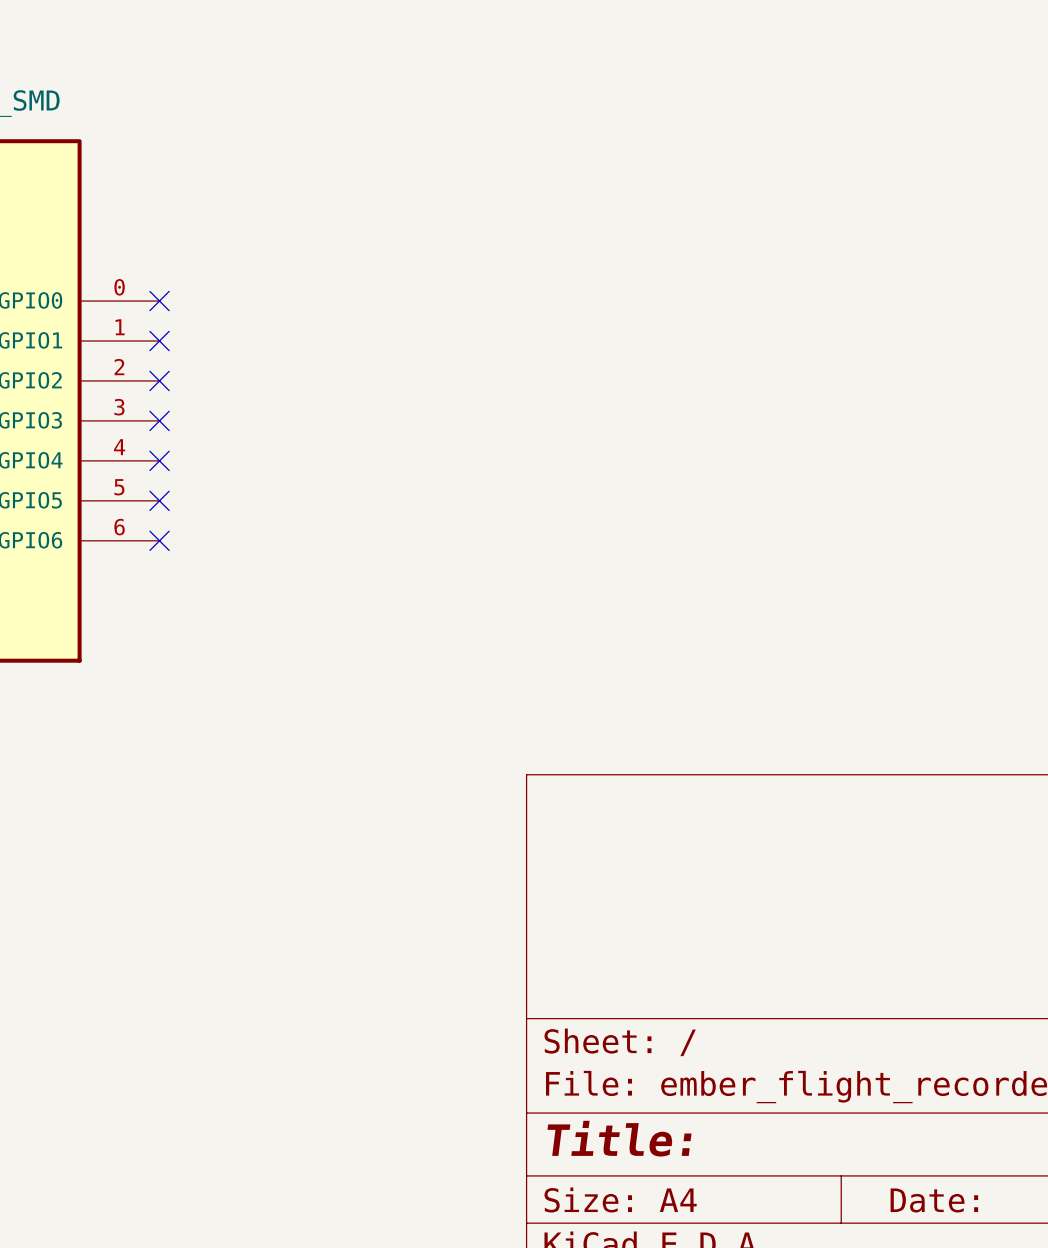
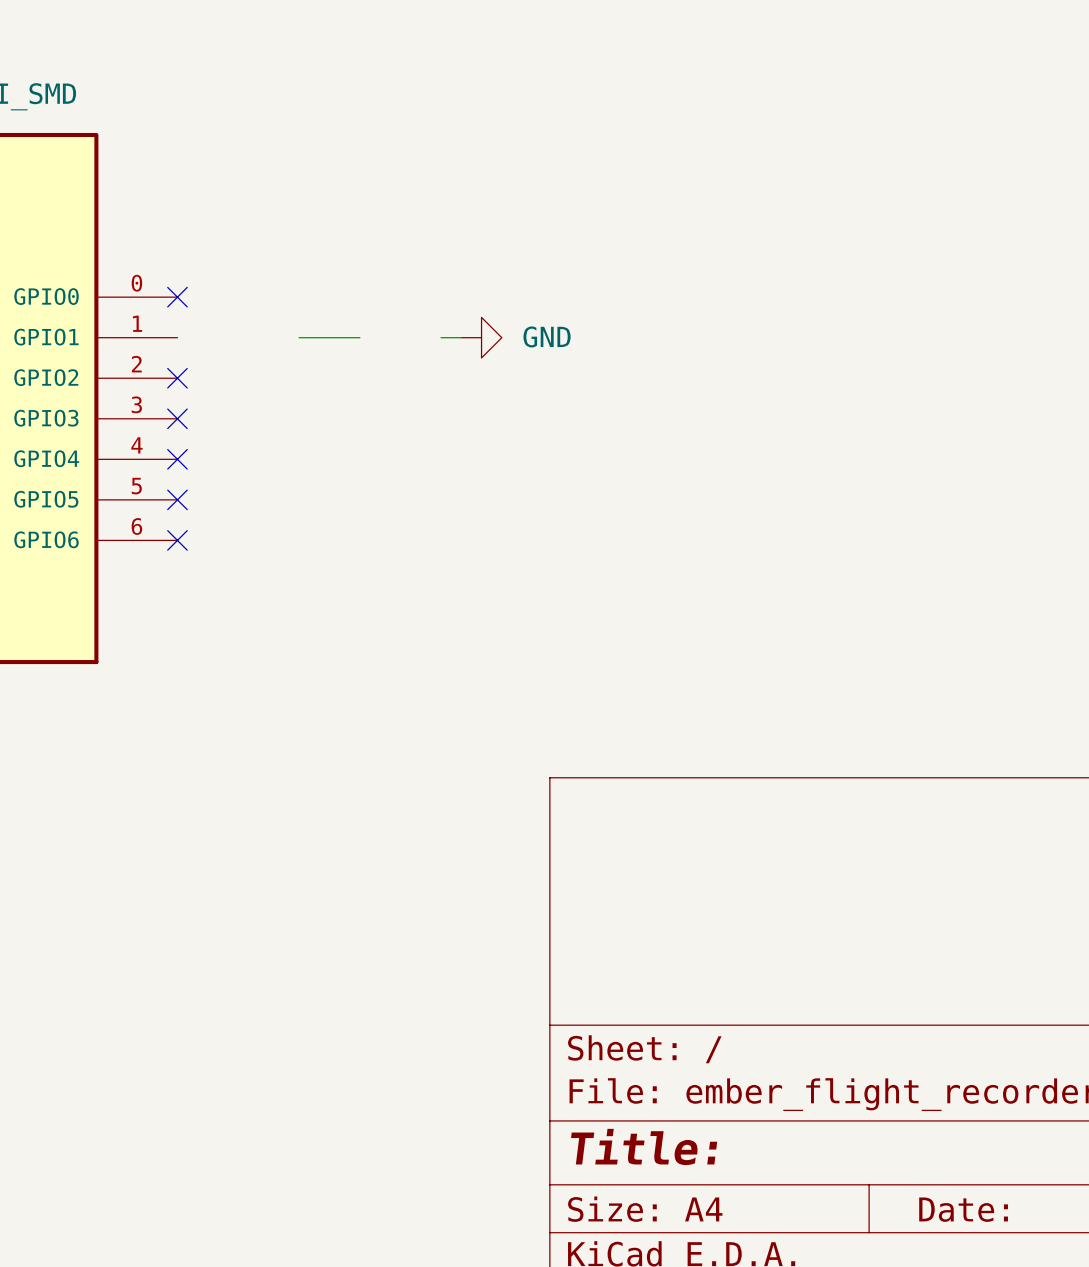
no-connect mark: (159, 341) -> none
wire: none -> (299, 337) (359, 337)
wire: none -> (441, 337) (461, 337)
power symbol: none -> GND (481, 337)

